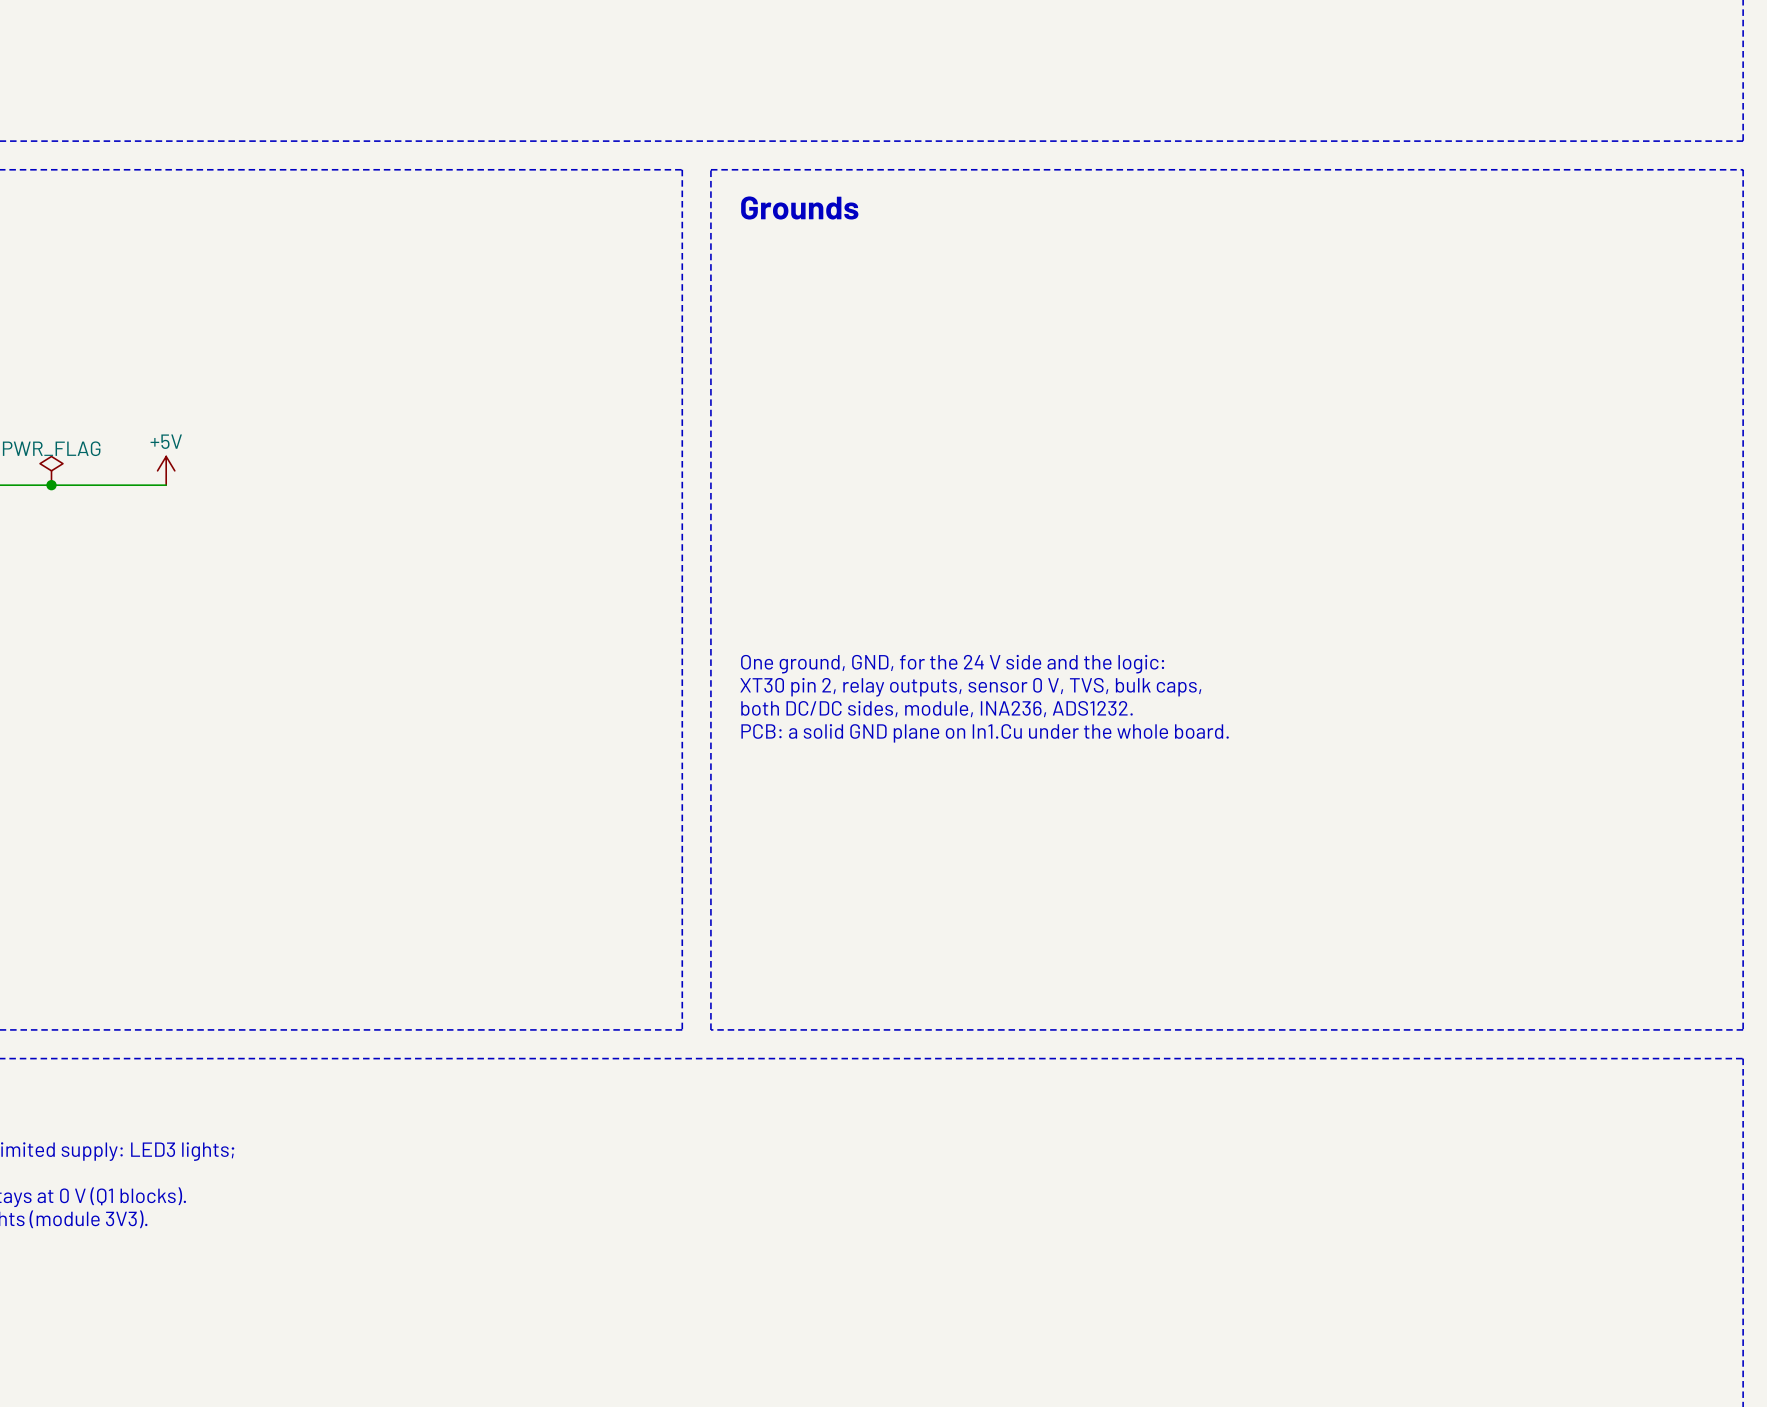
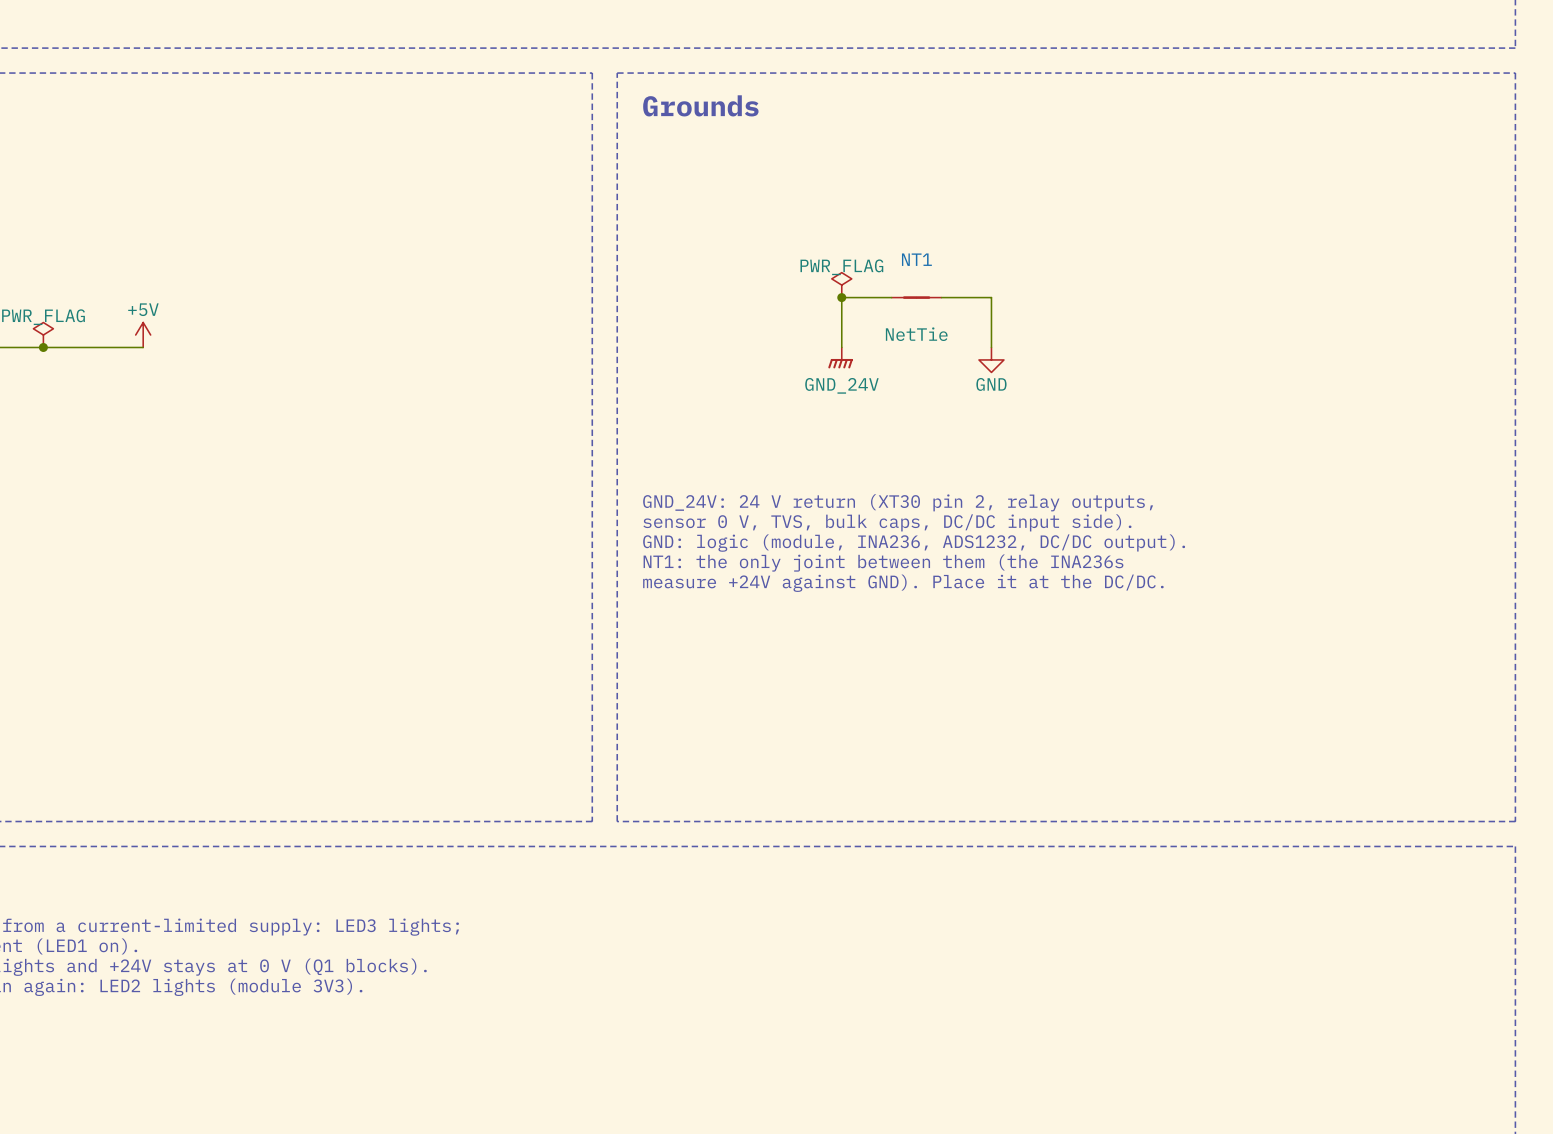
power symbol: none -> PWR_FLAG (841, 285)
junction: none -> (841, 297)
wire: none -> (891, 297) (841, 297) (841, 347)
NT1: none -> NetTie (916, 297)
wire: none -> (941, 297) (991, 297) (991, 347)
power symbol: none -> GND_24V (840, 357)
power symbol: none -> GND (991, 359)
text: One ground, GND, for the 24 V side and the logic: (952, 664) -> GND_24V: 24 V return (XT30 pin 2, relay outputs, (898, 502)
text: XT30 pin 2, relay outputs, sensor 0 V, TVS, bulk caps, (970, 687) -> sensor 0 V, TVS, bulk caps, DC/DC input side). (887, 522)
text: both DC/DC sides, module, INA236, ADS1232. (937, 709) -> GND: logic (module, INA236, ADS1232, DC/DC output). (914, 543)
text: PCB: a solid GND plane on In1.Cu under the whole board. (985, 733) -> NT1: the only joint between them (the INA236s (883, 563)
text: none -> measure +24V against GND). Place it at the DC/DC. (903, 583)

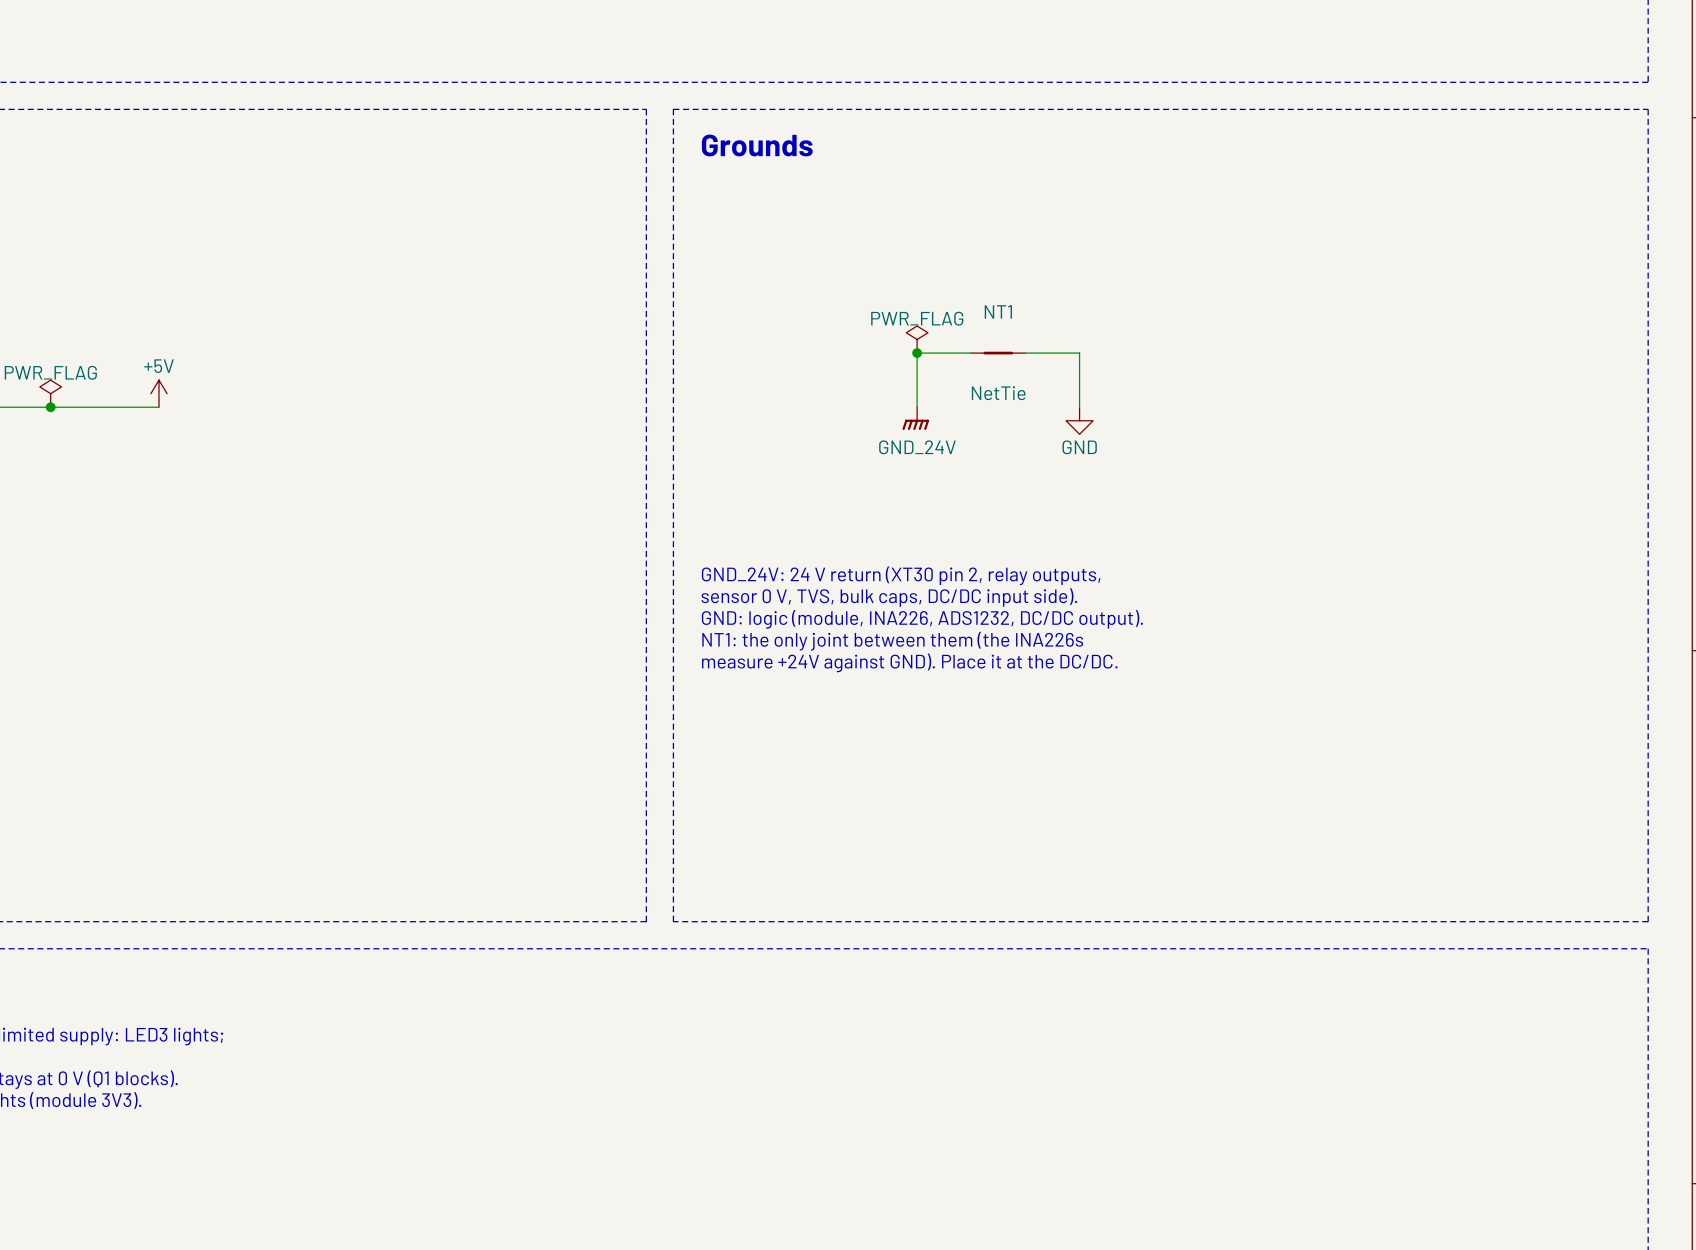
text: GND: logic (module, INA236, ADS1232, DC/DC output). (914, 543) -> GND: logic (module, INA226, ADS1232, DC/DC output). (922, 619)
text: NT1: the only joint between them (the INA236s (883, 563) -> NT1: the only joint between them (the INA226s (892, 641)

